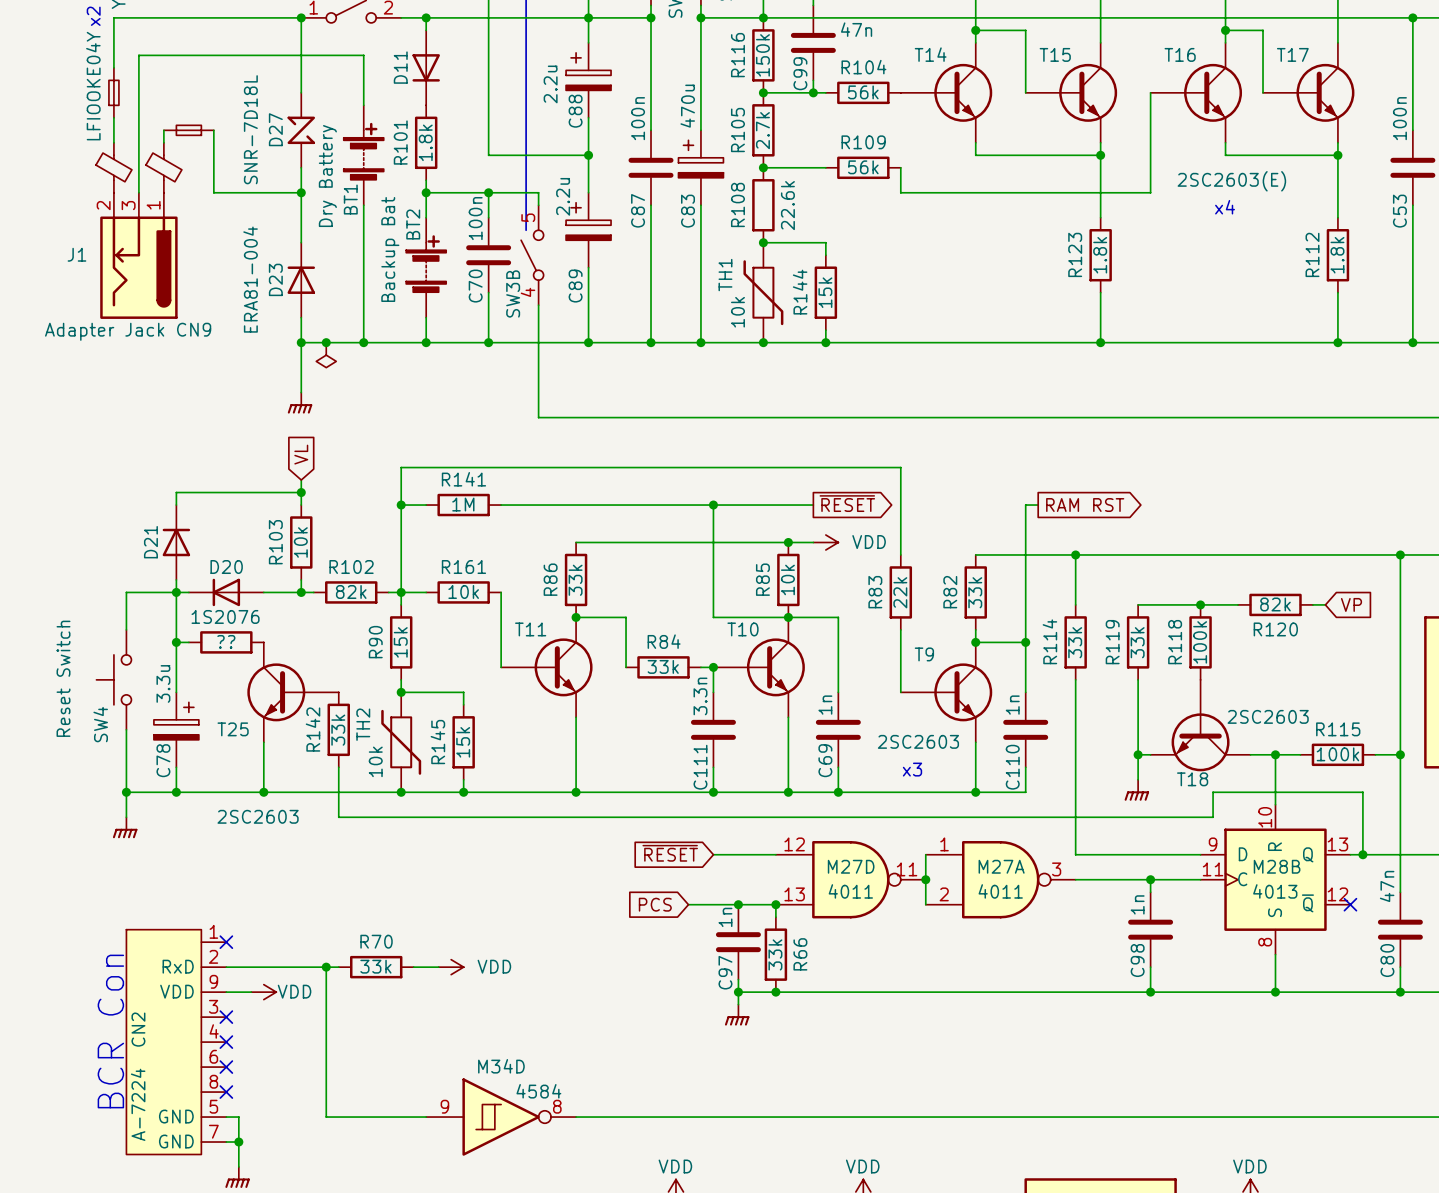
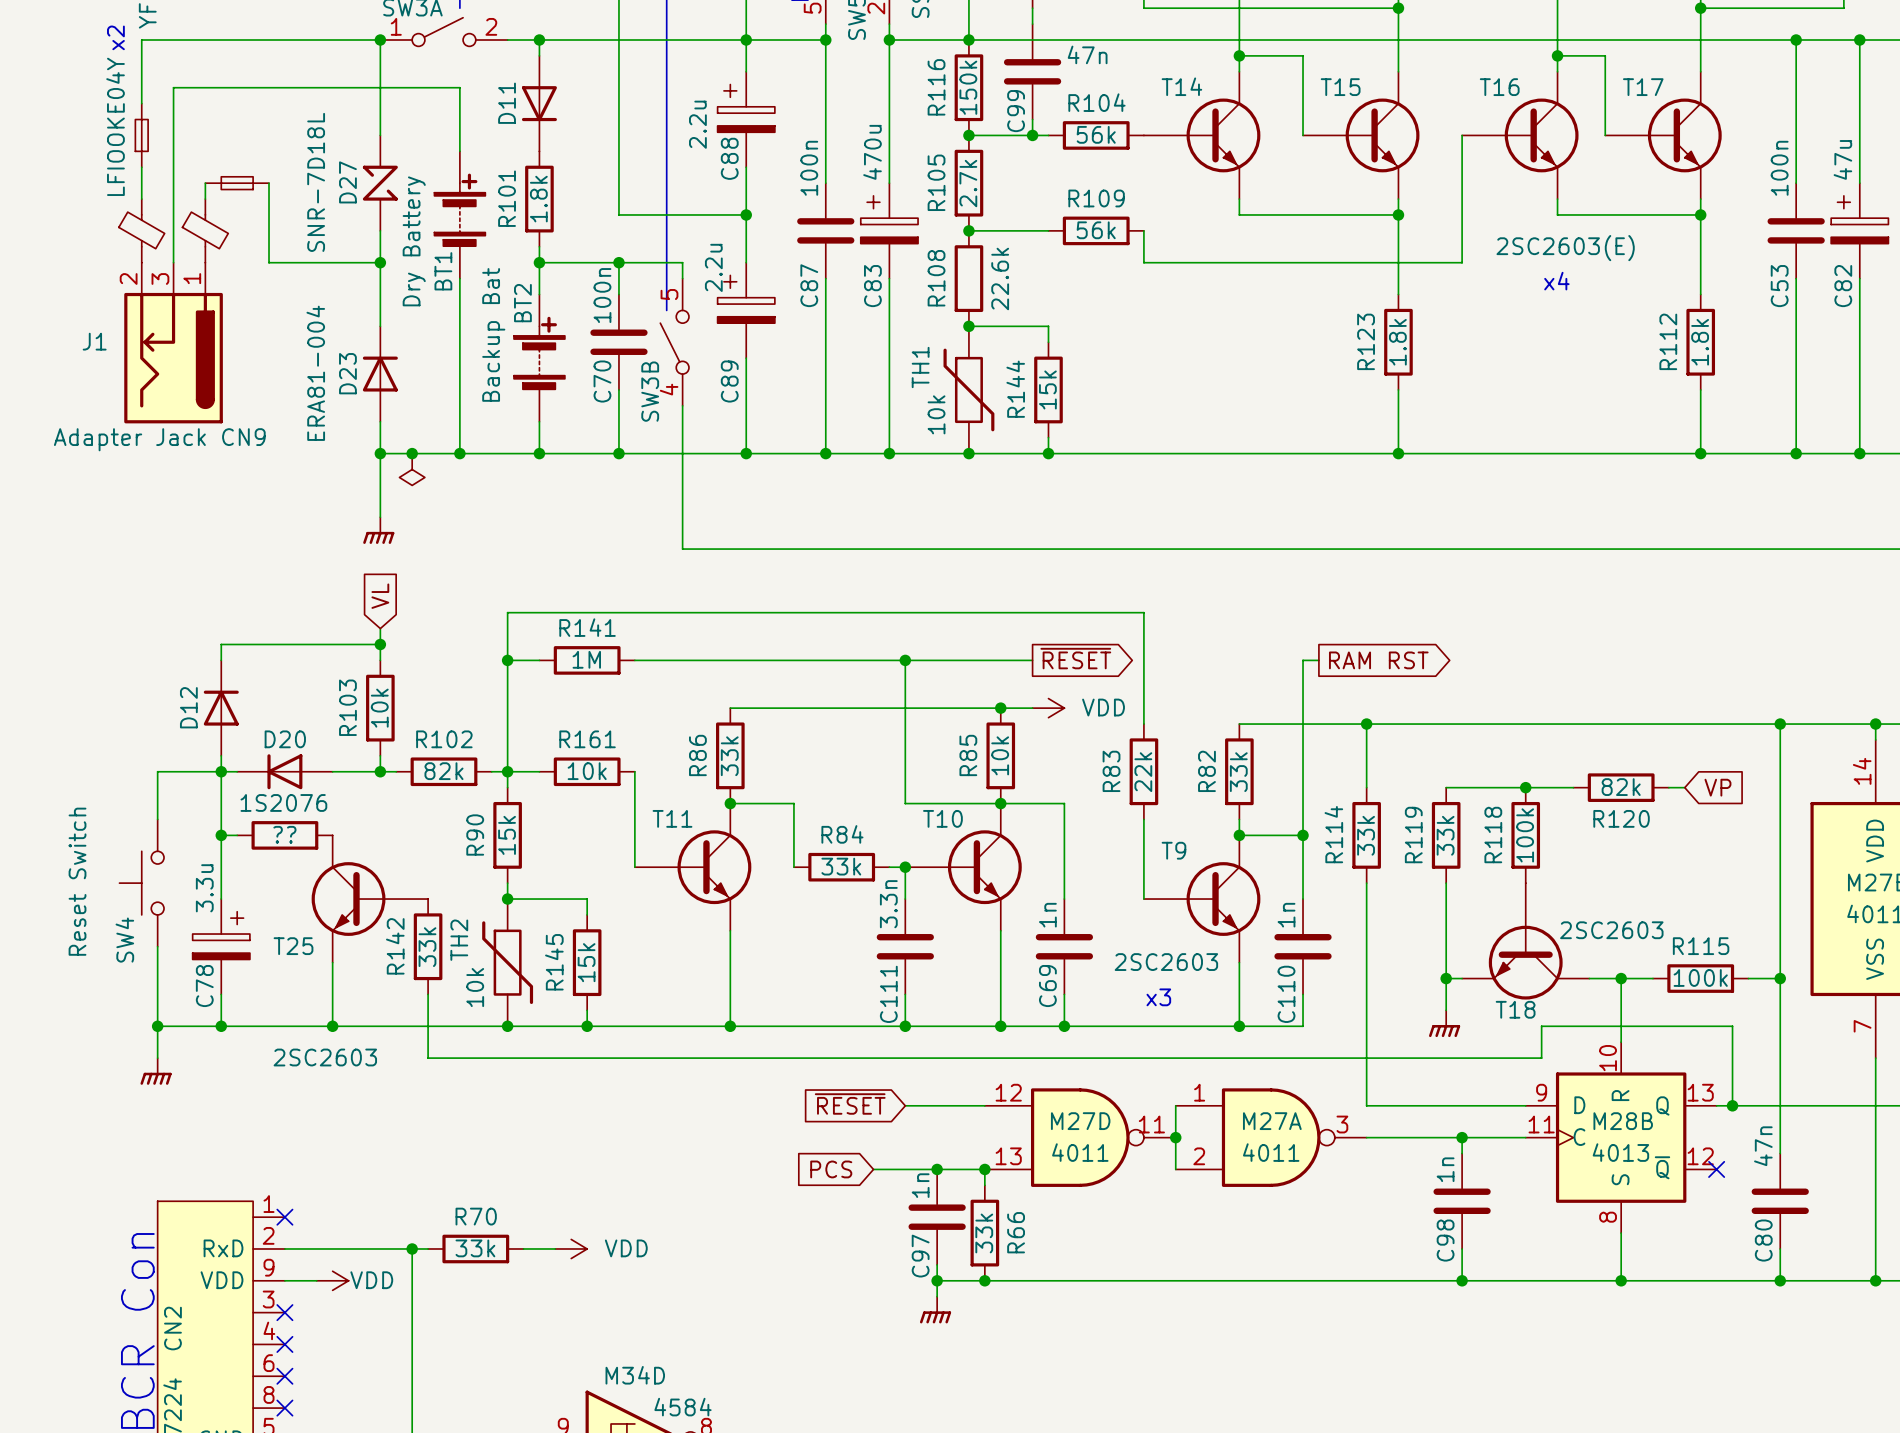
D21 name: D21 (150, 542) -> D12 (188, 707)

